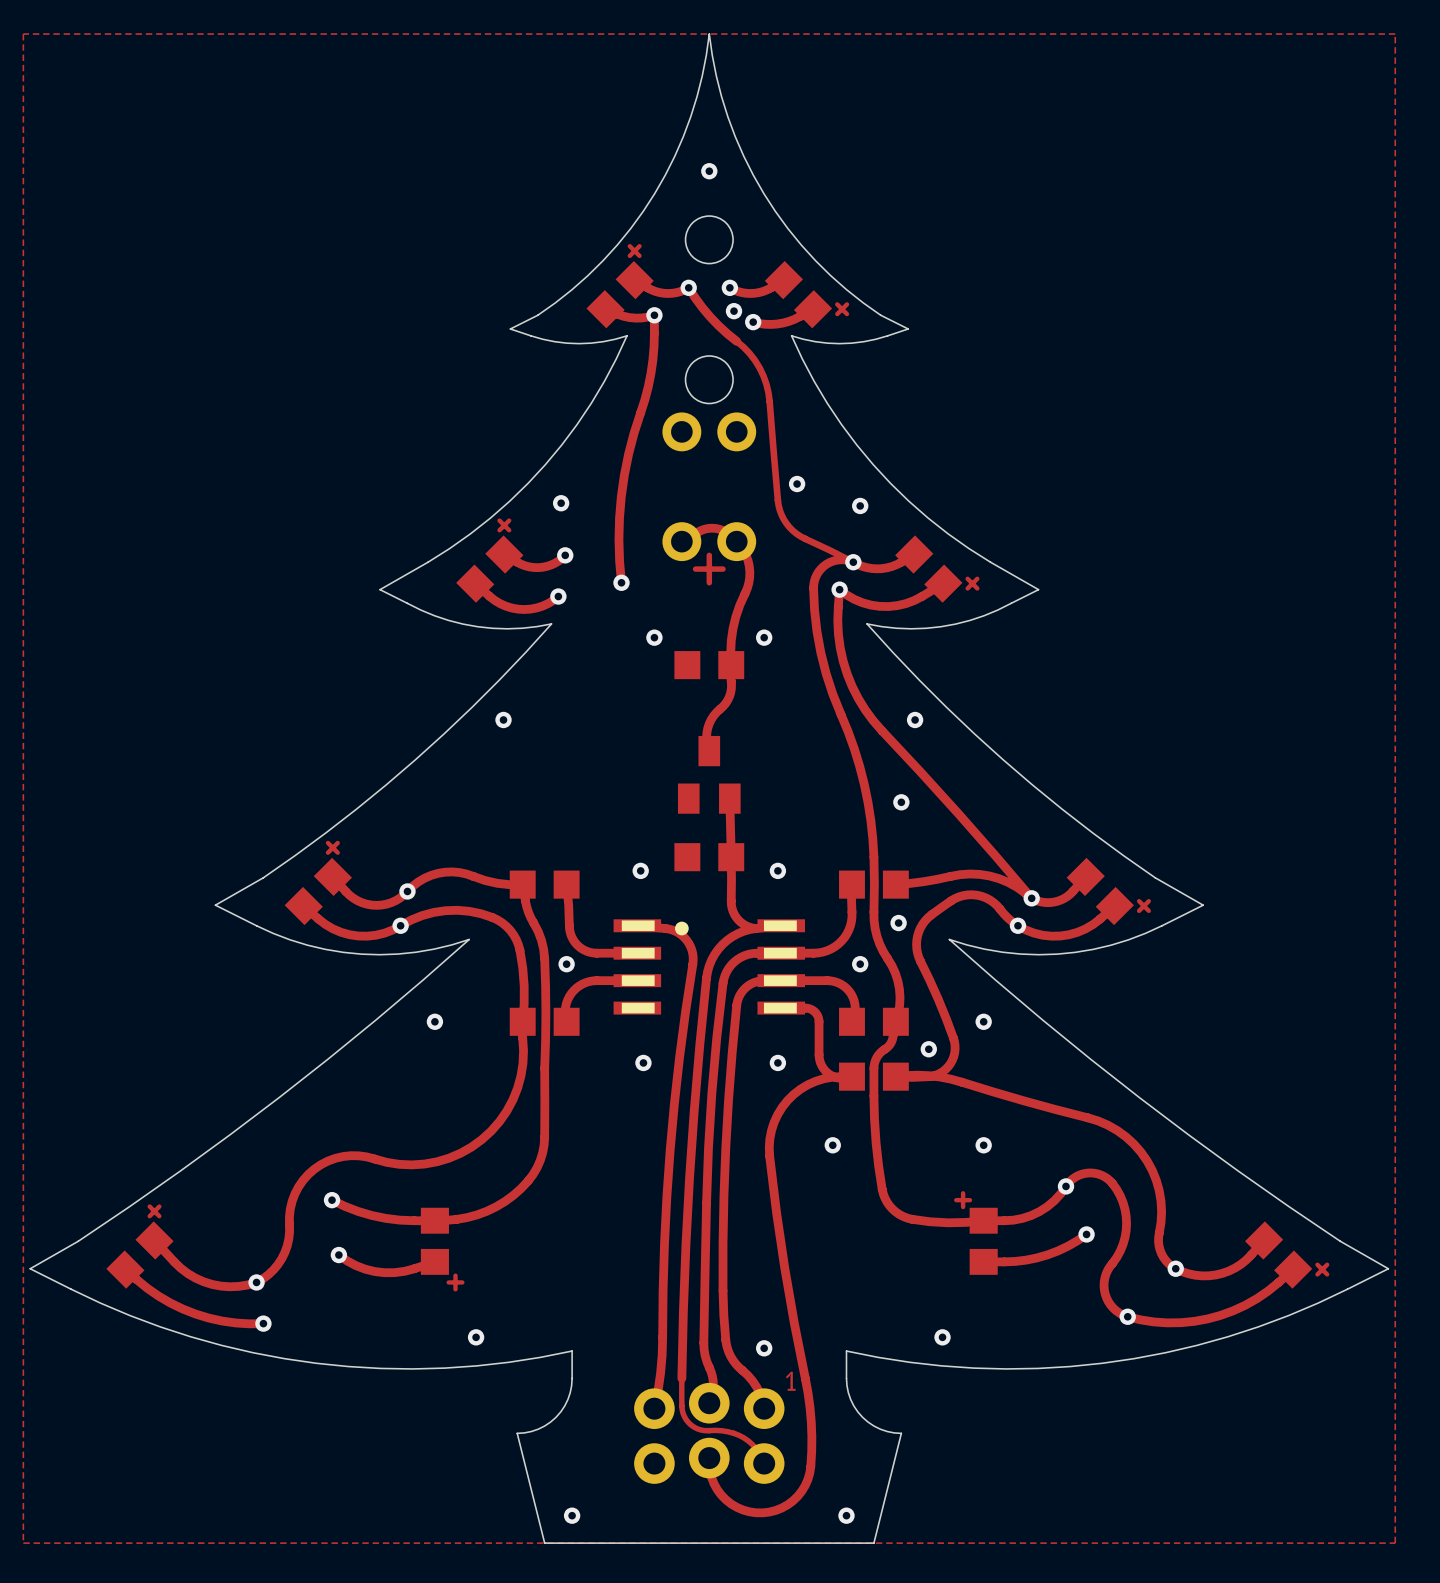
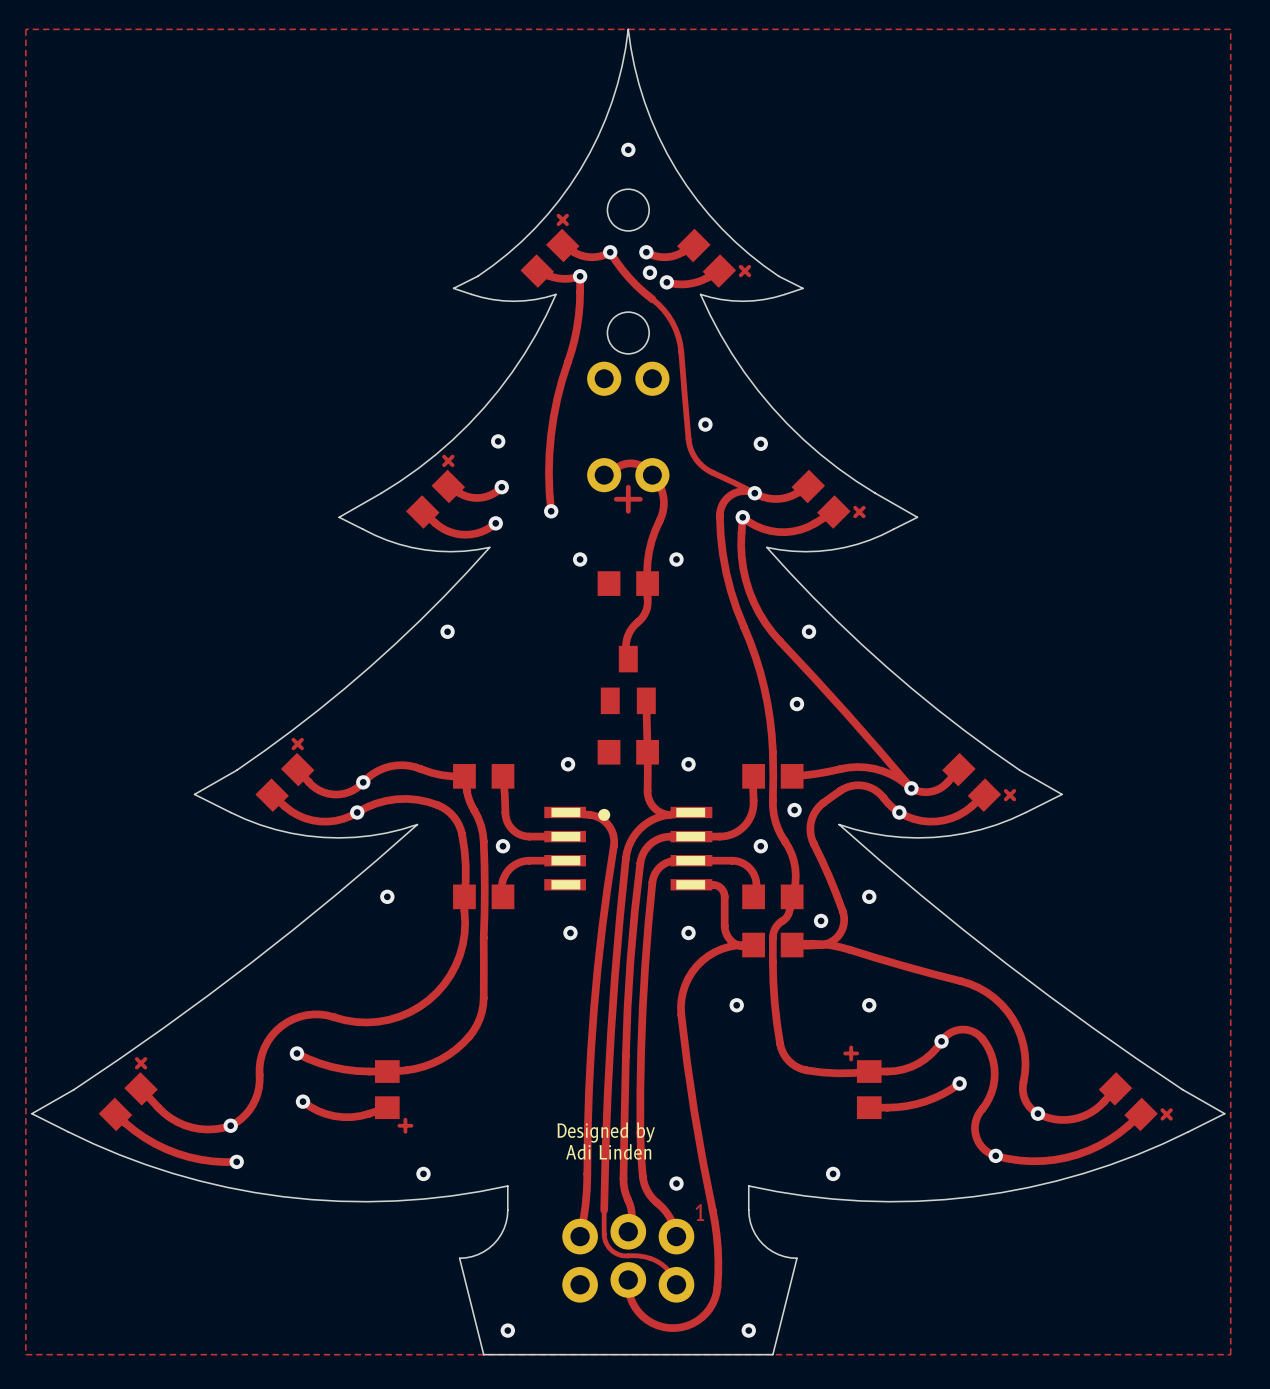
text: none -> Designed by (606, 1132)
text: none -> Adi Linden (608, 1151)

